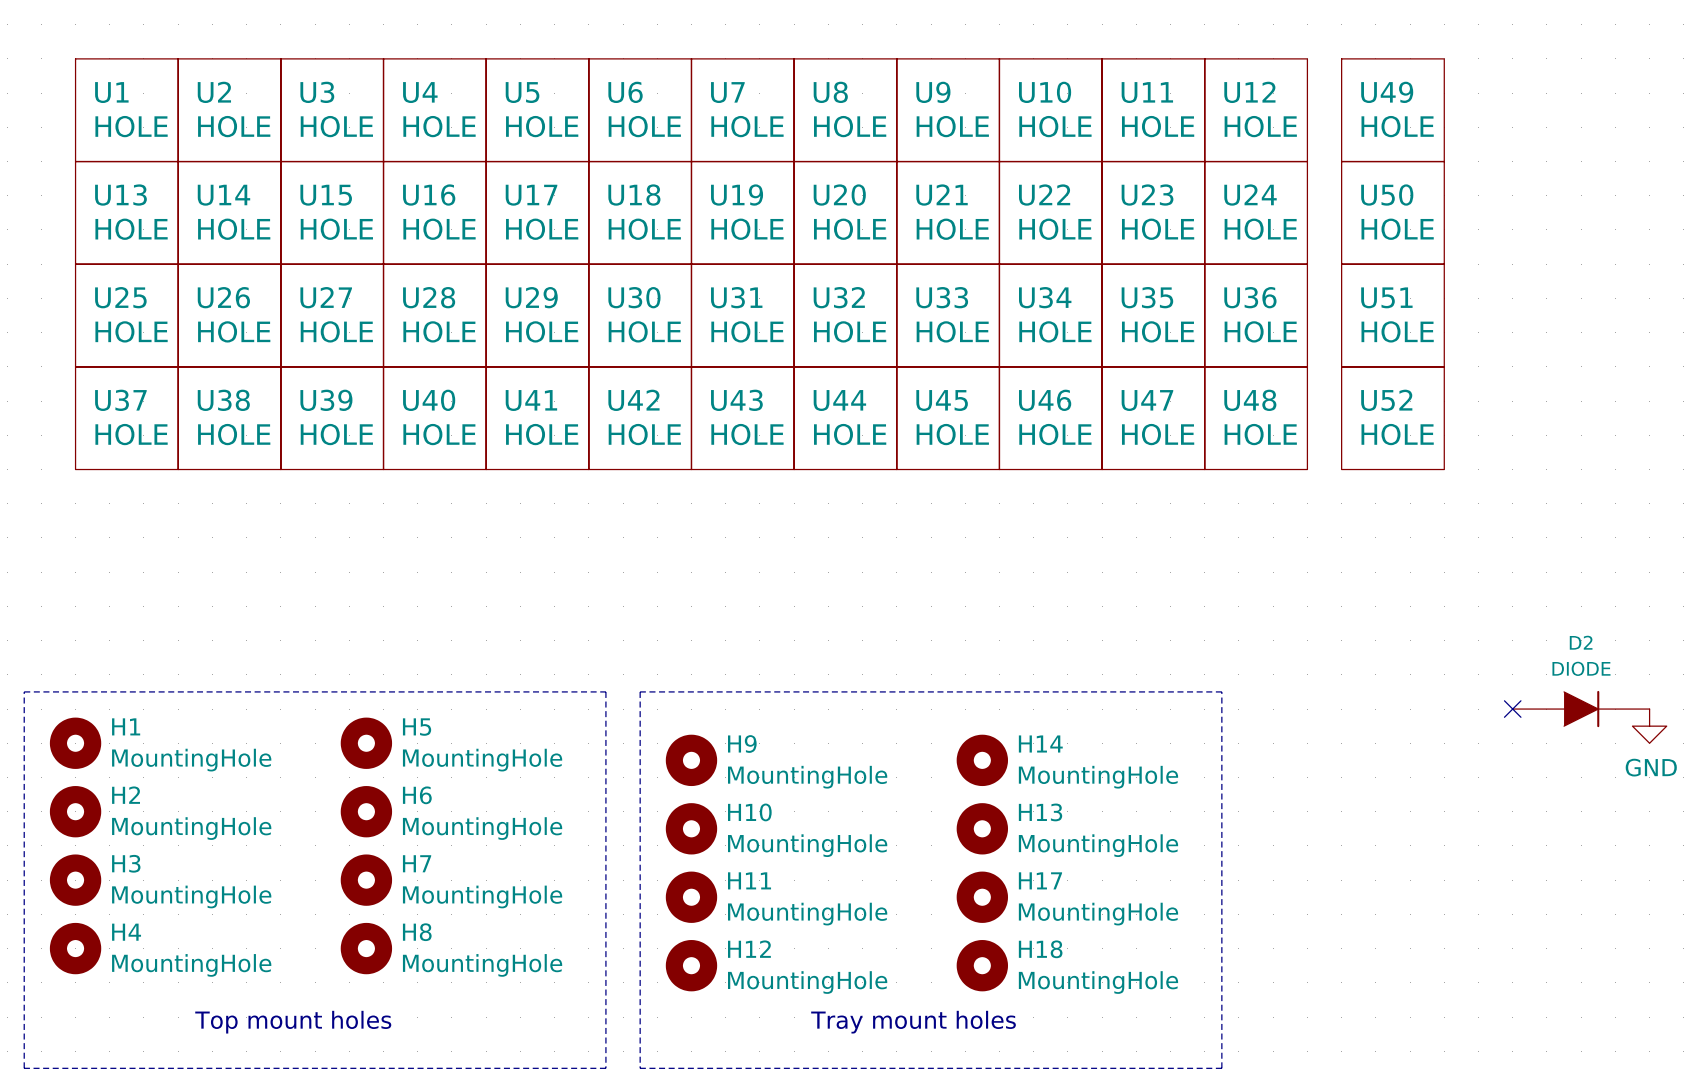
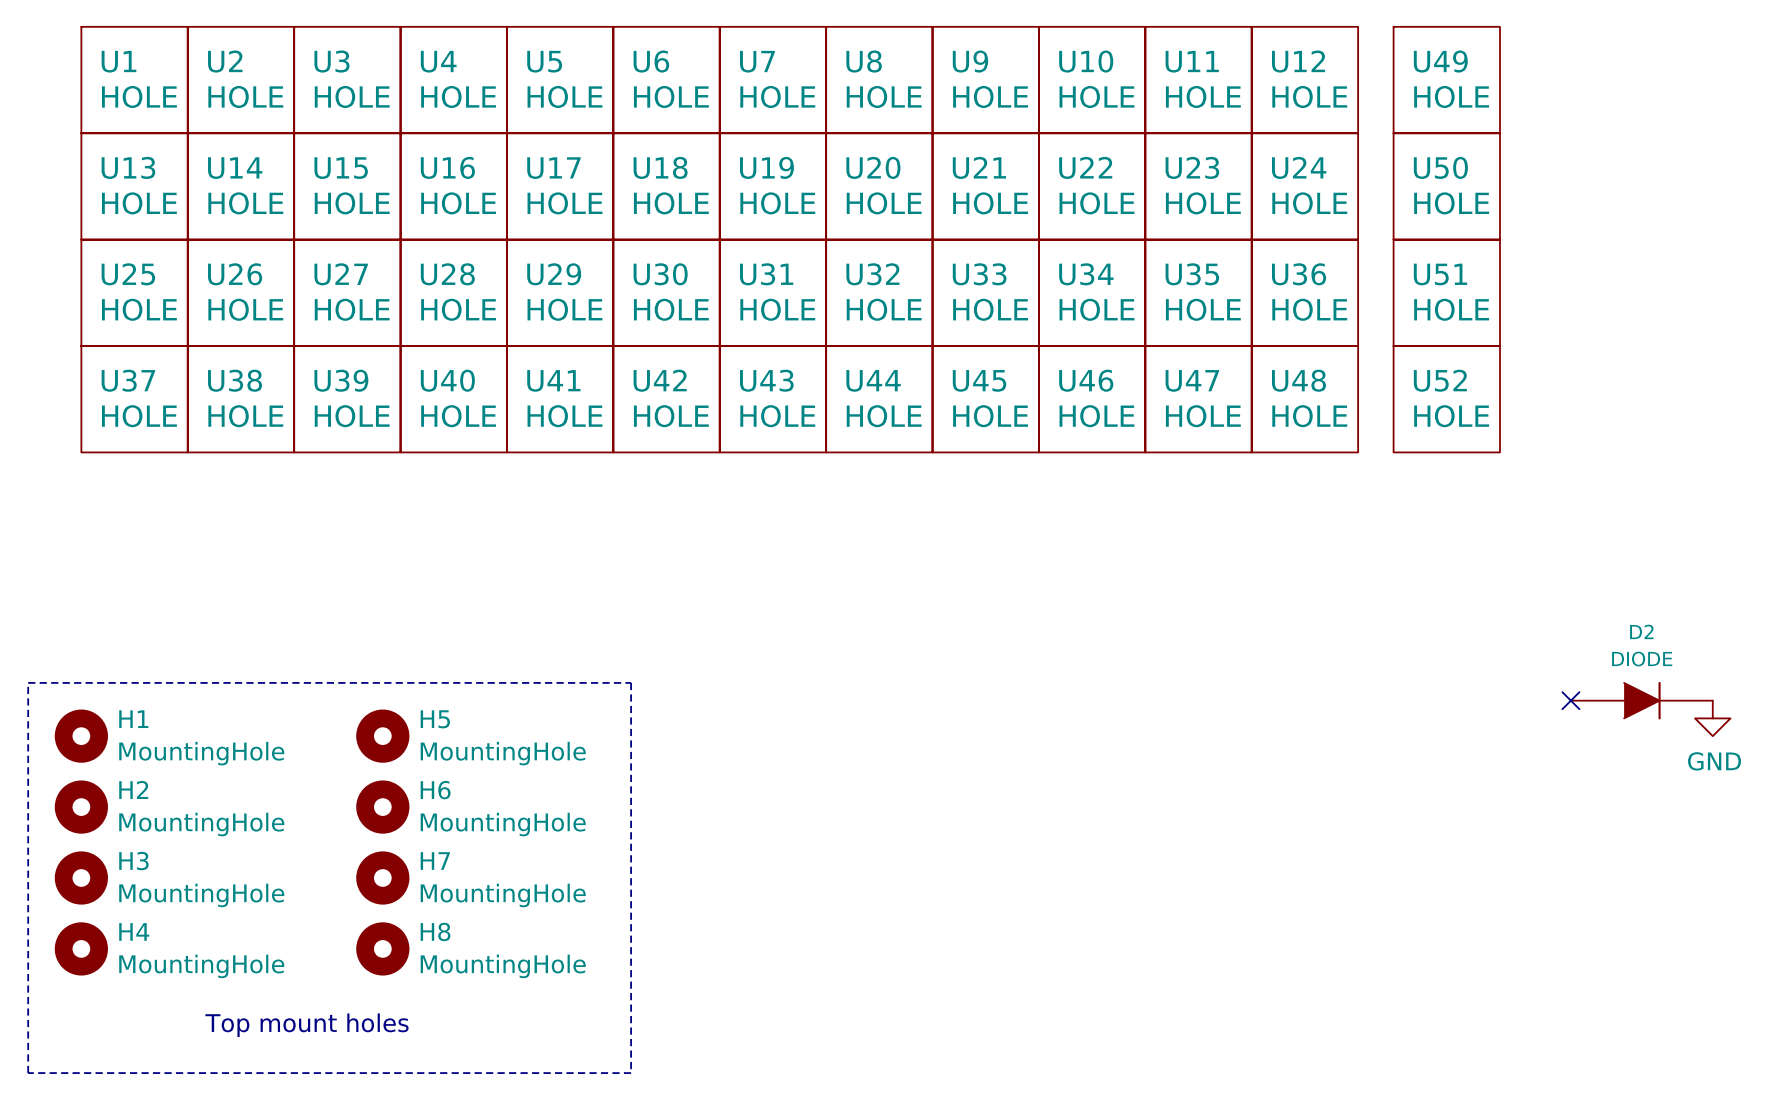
line: (640, 691) (1221, 691) (1221, 1068) (640, 1068) (640, 691) -> none
H9: MountingHole (691, 760) -> none
H14: MountingHole (982, 760) -> none
H10: MountingHole (691, 828) -> none
H13: MountingHole (982, 828) -> none
H11: MountingHole (691, 897) -> none
H17: MountingHole (982, 897) -> none
H12: MountingHole (691, 965) -> none
H18: MountingHole (982, 965) -> none
text: Tray mount holes (913, 1022) -> none

